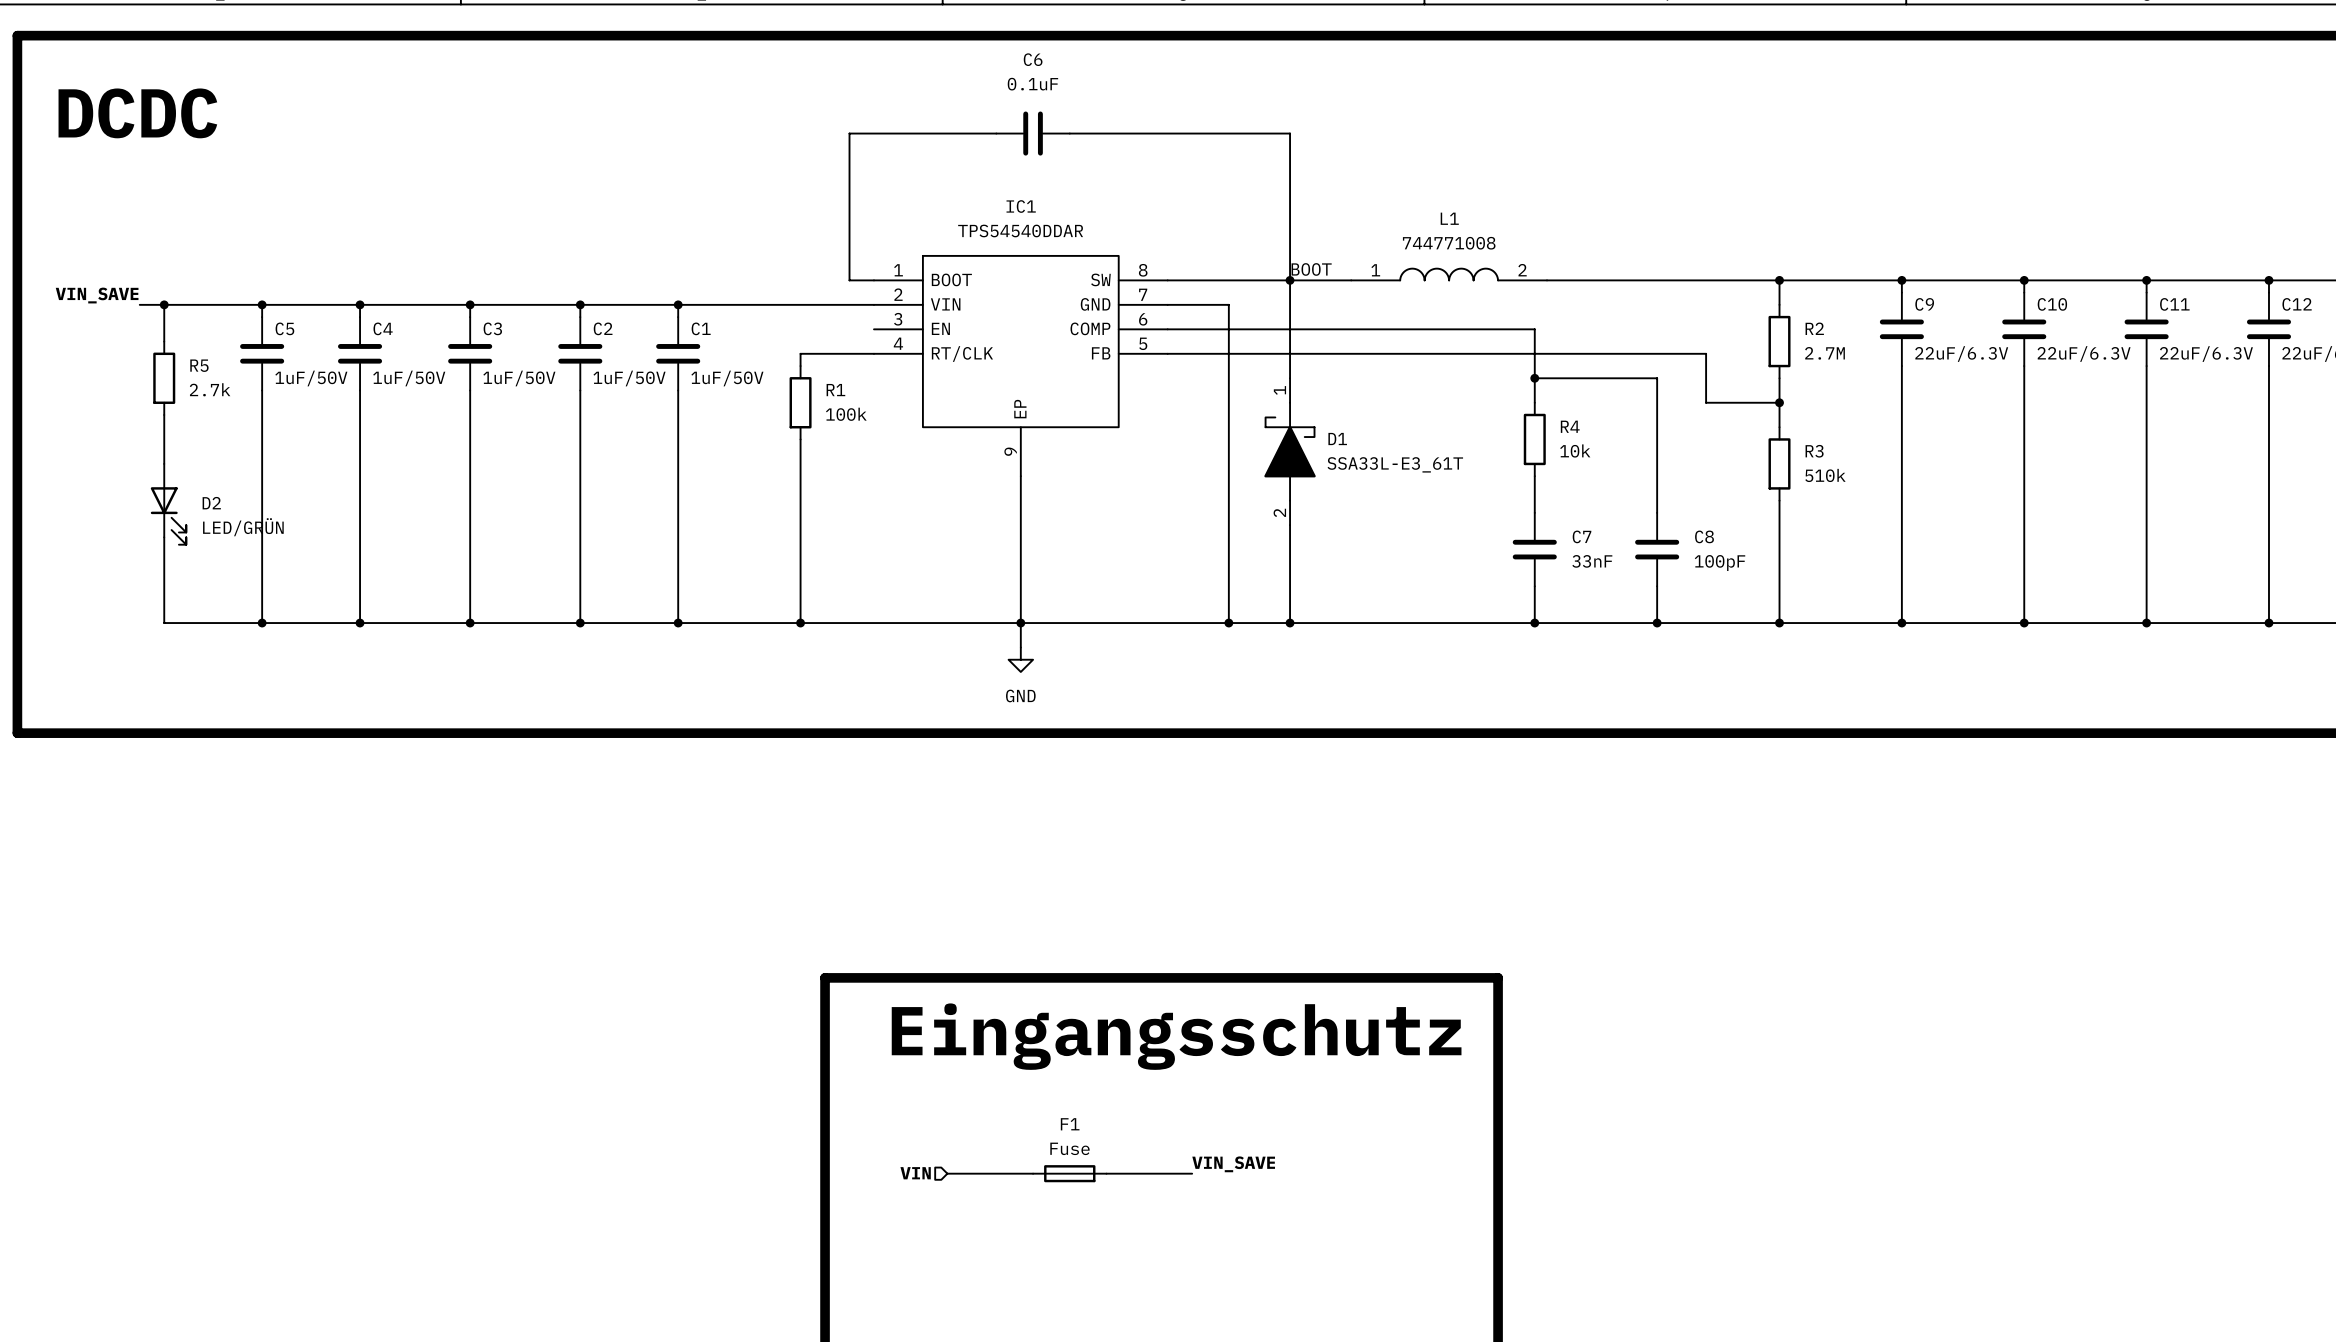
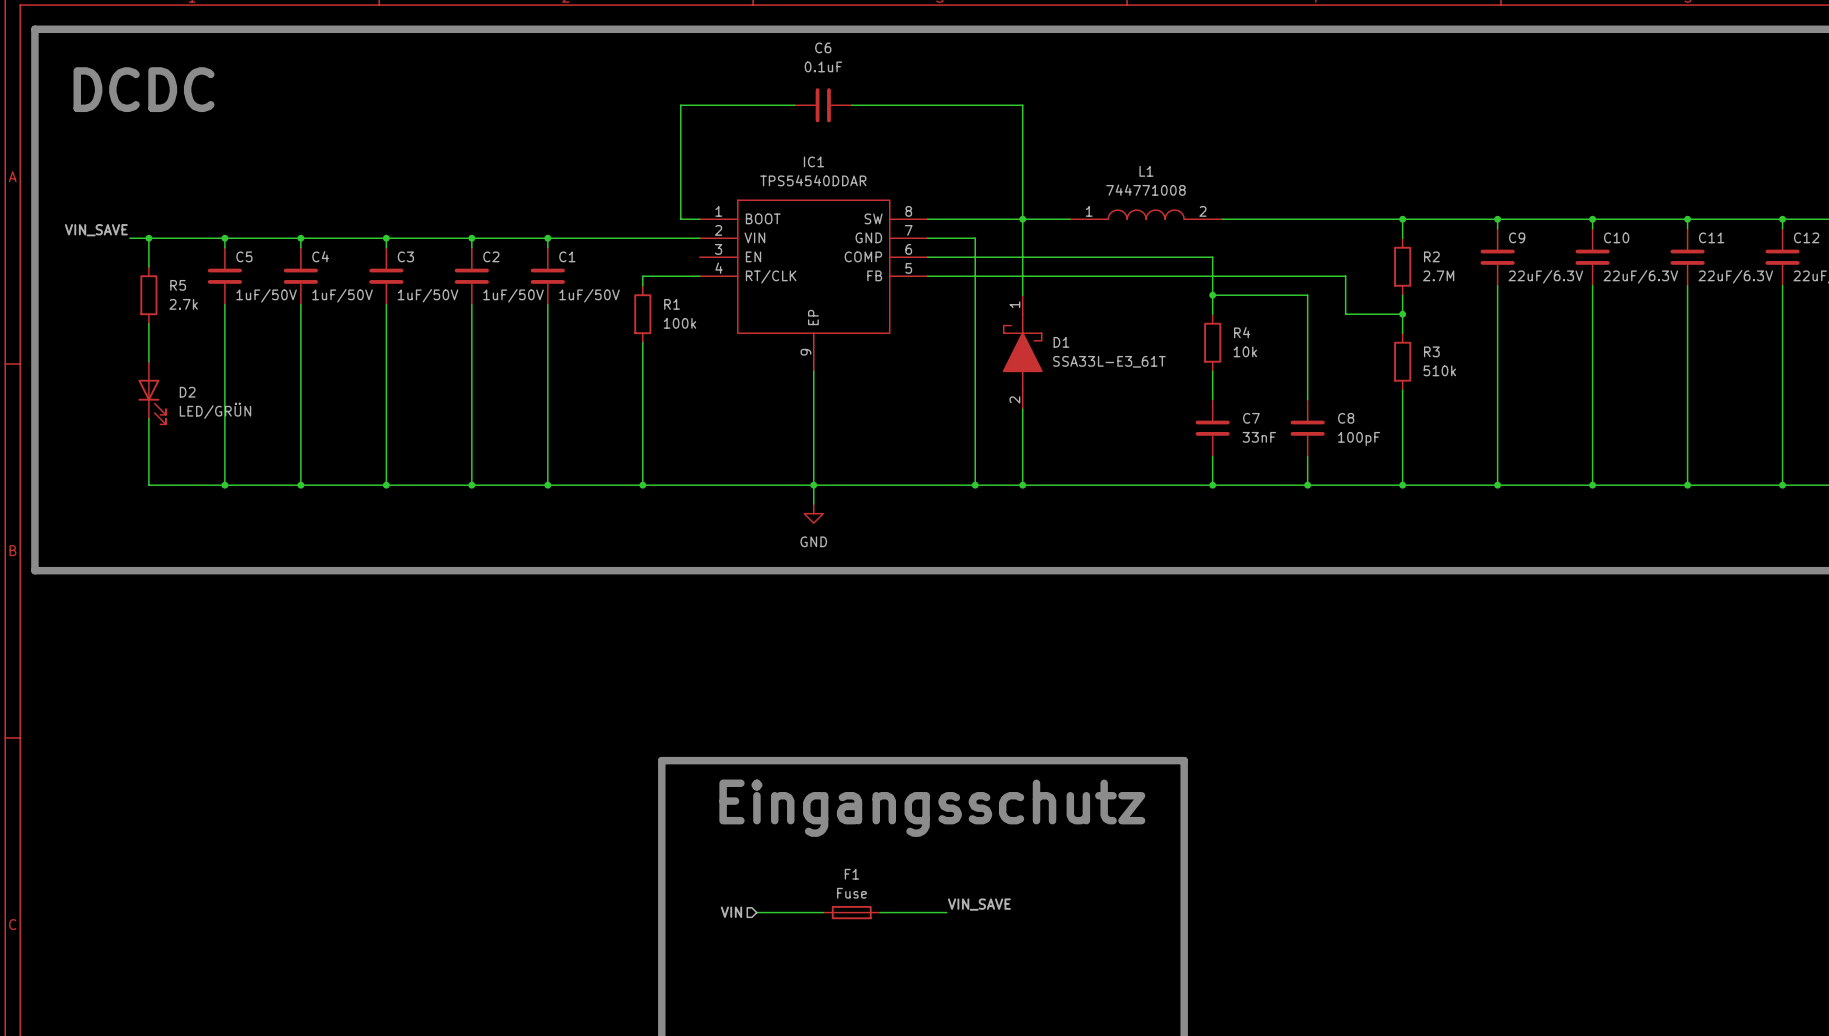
label: BOOT (1311, 269) -> none

